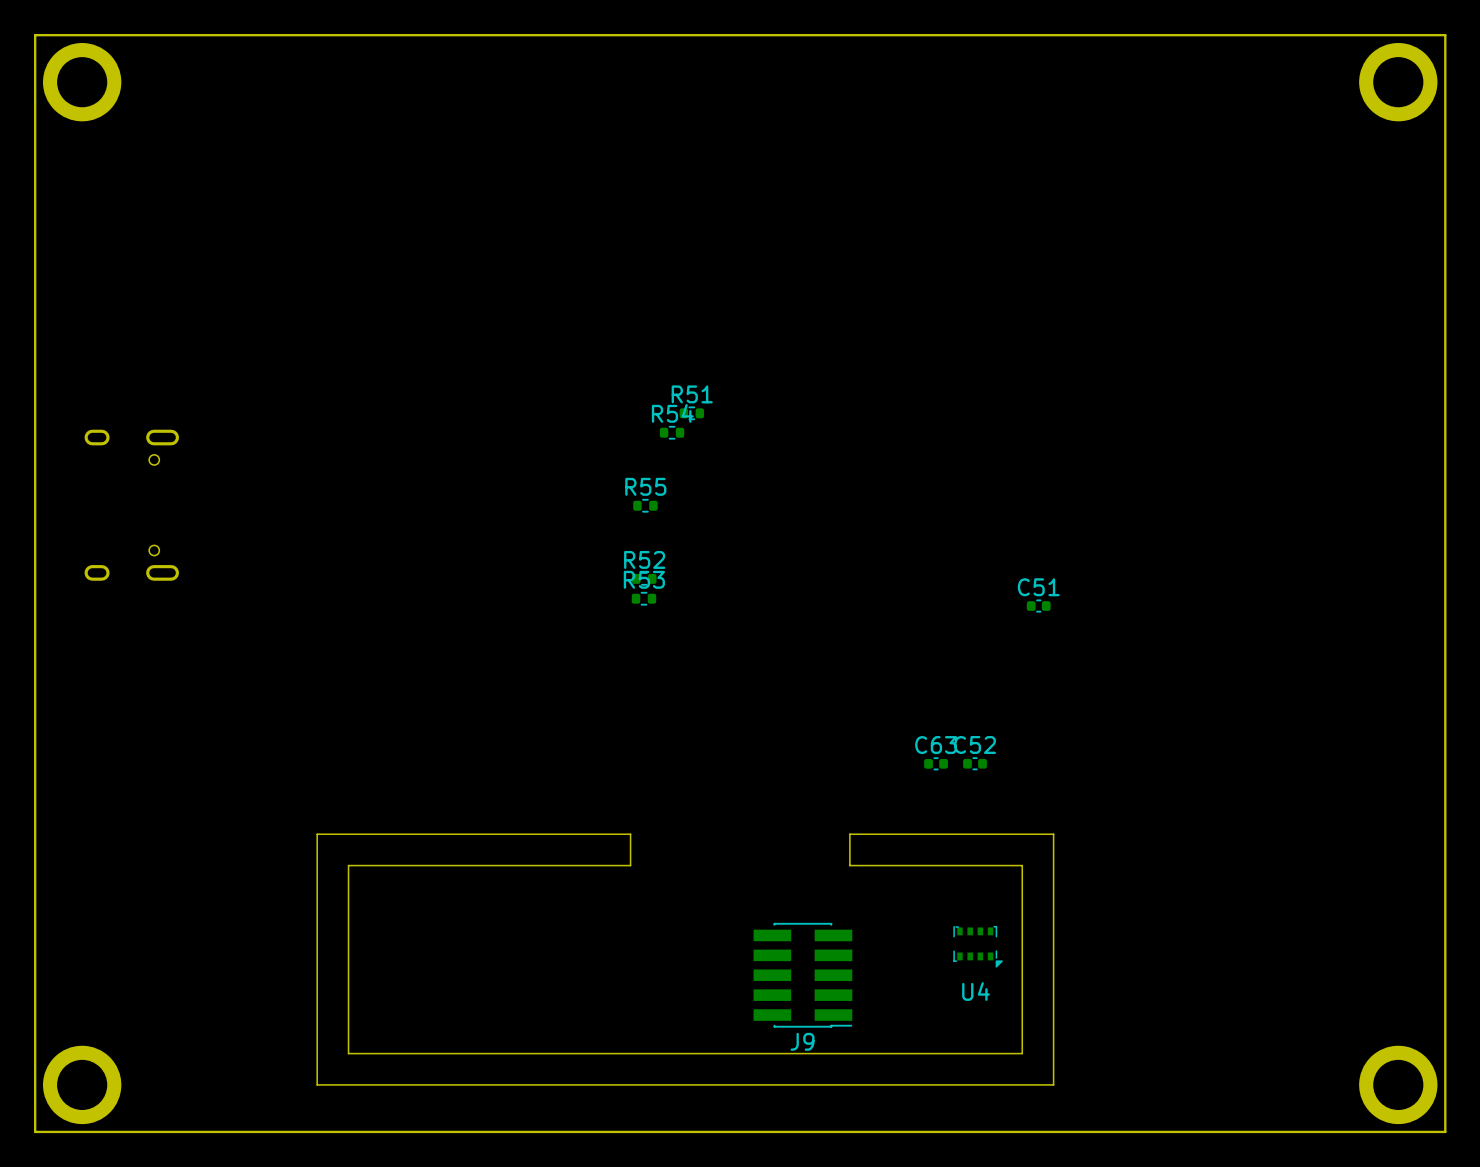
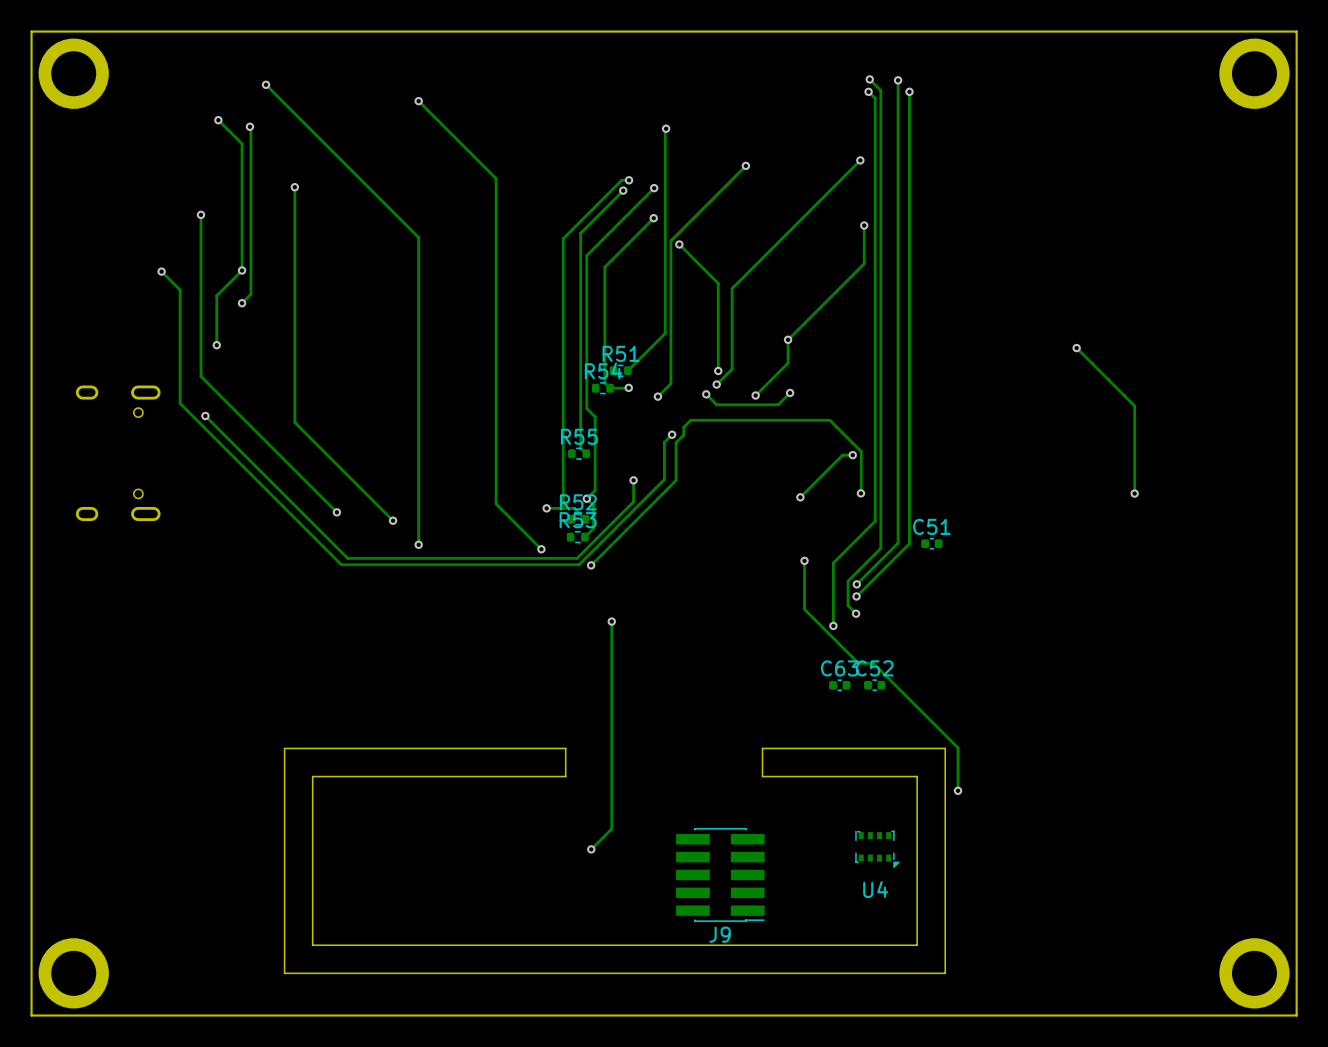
track: none -> (869, 79) (880, 90) (880, 548) (848, 581) (848, 605) (856, 613)
via: none -> (869, 79)
track: none -> (898, 80) (898, 543) (856, 584)
via: none -> (898, 80)
track: none -> (265, 84) (418, 237) (418, 544)
via: none -> (265, 84)
track: none -> (868, 91) (875, 98) (875, 521) (833, 563) (833, 625)
via: none -> (868, 91)
track: none -> (909, 91) (909, 543) (856, 596)
via: none -> (909, 91)
track: none -> (418, 101) (496, 178) (496, 503) (541, 549)
via: none -> (418, 101)
track: none -> (218, 120) (242, 143) (242, 270) (216, 295) (216, 345)
via: none -> (218, 120)
track: none -> (249, 126) (250, 294) (242, 303)
via: none -> (249, 126)
track: none -> (666, 128) (665, 333) (627, 370)
via: none -> (666, 128)
track: none -> (860, 160) (732, 288) (732, 369) (716, 384)
via: none -> (860, 160)
track: none -> (745, 165) (670, 240) (670, 383) (657, 396)
via: none -> (745, 165)
track: none -> (629, 180) (621, 180) (563, 238) (563, 508)
via: none -> (629, 180)
track: none -> (294, 187) (294, 422) (393, 520)
via: none -> (294, 187)
track: none -> (654, 188) (586, 255) (586, 408) (595, 416) (595, 490) (586, 498) (593, 505) (593, 528) (584, 537)
via: none -> (654, 188)
track: none -> (623, 190) (580, 233) (580, 448) (586, 453)
via: none -> (623, 190)
track: none -> (201, 214) (201, 376) (336, 512)
via: none -> (201, 214)
track: none -> (653, 218) (604, 267) (604, 382) (610, 388) (628, 387)
via: none -> (653, 218)
track: none -> (864, 225) (864, 263) (788, 339) (788, 363) (755, 395)
via: none -> (864, 225)
track: none -> (679, 244) (718, 283) (718, 371)
via: none -> (679, 244)
via: none -> (242, 270)
track: none -> (161, 271) (180, 290) (180, 403) (341, 564) (579, 564) (664, 479) (664, 442) (672, 434)
via: none -> (161, 271)
via: none -> (242, 303)
via: none -> (788, 339)
via: none -> (216, 345)
track: none -> (1076, 348) (1134, 406) (1134, 493)
via: none -> (1076, 348)
via: none -> (718, 371)
via: none -> (716, 384)
via: none -> (628, 387)
track: none -> (790, 392) (778, 404) (716, 404) (706, 394)
via: none -> (790, 392)
via: none -> (706, 394)
via: none -> (755, 395)
via: none -> (657, 396)
track: none -> (205, 415) (347, 558) (576, 558) (633, 501) (633, 480)
via: none -> (205, 415)
via: none -> (672, 434)
track: none -> (852, 455) (842, 455) (800, 497)
via: none -> (852, 455)
via: none -> (633, 480)
track: none -> (860, 493) (861, 451) (829, 420) (690, 420) (683, 427) (683, 434) (676, 442) (676, 480) (591, 565)
via: none -> (860, 493)
via: none -> (1134, 493)
via: none -> (800, 497)
via: none -> (586, 498)
track: none -> (546, 508) (574, 508) (585, 519)
via: none -> (546, 508)
via: none -> (336, 512)
via: none -> (393, 520)
via: none -> (418, 544)
via: none -> (541, 549)
track: none -> (804, 560) (804, 609) (858, 663) (873, 663) (958, 747) (958, 790)
via: none -> (804, 560)
via: none -> (591, 565)
via: none -> (856, 584)
via: none -> (856, 596)
via: none -> (856, 613)
track: none -> (611, 621) (611, 828) (591, 849)
via: none -> (611, 621)
via: none -> (833, 625)
via: none -> (958, 790)
via: none -> (591, 849)

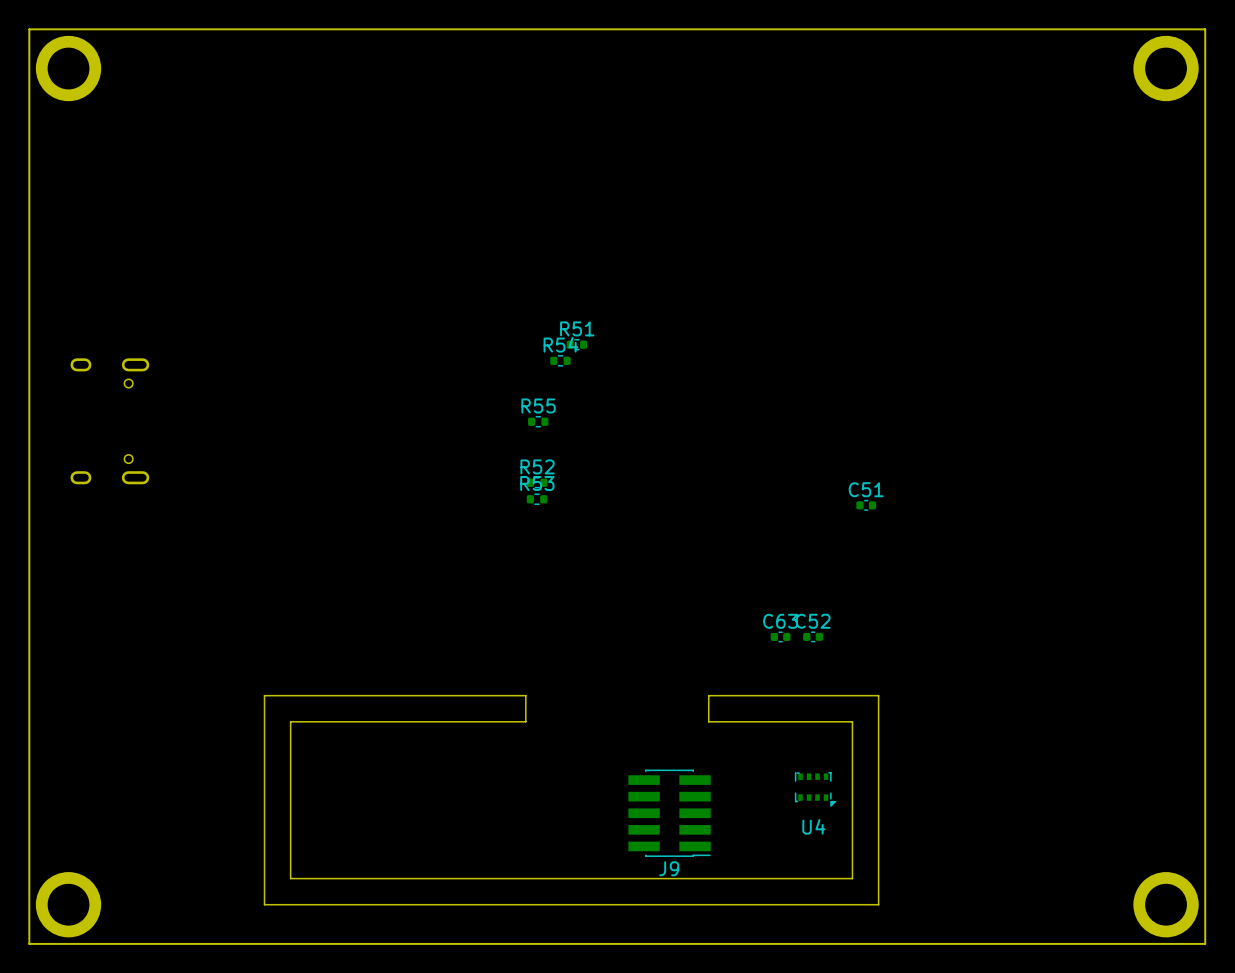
track: (869, 79) (880, 90) (880, 548) (848, 581) (848, 605) (856, 613) -> none
via: (869, 79) -> none
track: (898, 80) (898, 543) (856, 584) -> none
via: (898, 80) -> none
track: (265, 84) (418, 237) (418, 544) -> none
via: (265, 84) -> none
track: (868, 91) (875, 98) (875, 521) (833, 563) (833, 625) -> none
via: (868, 91) -> none
track: (909, 91) (909, 543) (856, 596) -> none
via: (909, 91) -> none
track: (418, 101) (496, 178) (496, 503) (541, 549) -> none
via: (418, 101) -> none
track: (218, 120) (242, 143) (242, 270) (216, 295) (216, 345) -> none
via: (218, 120) -> none
track: (249, 126) (250, 294) (242, 303) -> none
via: (249, 126) -> none
track: (666, 128) (665, 333) (627, 370) -> none
via: (666, 128) -> none
track: (860, 160) (732, 288) (732, 369) (716, 384) -> none
via: (860, 160) -> none
track: (745, 165) (670, 240) (670, 383) (657, 396) -> none
via: (745, 165) -> none
track: (629, 180) (621, 180) (563, 238) (563, 508) -> none
via: (629, 180) -> none
track: (294, 187) (294, 422) (393, 520) -> none
via: (294, 187) -> none
track: (654, 188) (586, 255) (586, 408) (595, 416) (595, 490) (586, 498) (593, 505) (593, 528) (584, 537) -> none
via: (654, 188) -> none
track: (623, 190) (580, 233) (580, 448) (586, 453) -> none
via: (623, 190) -> none
track: (201, 214) (201, 376) (336, 512) -> none
via: (201, 214) -> none
track: (653, 218) (604, 267) (604, 382) (610, 388) (628, 387) -> none
via: (653, 218) -> none
track: (864, 225) (864, 263) (788, 339) (788, 363) (755, 395) -> none
via: (864, 225) -> none
track: (679, 244) (718, 283) (718, 371) -> none
via: (679, 244) -> none
via: (242, 270) -> none
track: (161, 271) (180, 290) (180, 403) (341, 564) (579, 564) (664, 479) (664, 442) (672, 434) -> none
via: (161, 271) -> none
via: (242, 303) -> none
via: (788, 339) -> none
via: (216, 345) -> none
track: (1076, 348) (1134, 406) (1134, 493) -> none
via: (1076, 348) -> none
via: (718, 371) -> none
via: (716, 384) -> none
via: (628, 387) -> none
track: (790, 392) (778, 404) (716, 404) (706, 394) -> none
via: (790, 392) -> none
via: (706, 394) -> none
via: (755, 395) -> none
via: (657, 396) -> none
track: (205, 415) (347, 558) (576, 558) (633, 501) (633, 480) -> none
via: (205, 415) -> none
via: (672, 434) -> none
track: (852, 455) (842, 455) (800, 497) -> none
via: (852, 455) -> none
via: (633, 480) -> none
track: (860, 493) (861, 451) (829, 420) (690, 420) (683, 427) (683, 434) (676, 442) (676, 480) (591, 565) -> none
via: (860, 493) -> none
via: (1134, 493) -> none
via: (800, 497) -> none
via: (586, 498) -> none
track: (546, 508) (574, 508) (585, 519) -> none
via: (546, 508) -> none
via: (336, 512) -> none
via: (393, 520) -> none
via: (418, 544) -> none
via: (541, 549) -> none
track: (804, 560) (804, 609) (858, 663) (873, 663) (958, 747) (958, 790) -> none
via: (804, 560) -> none
via: (591, 565) -> none
via: (856, 584) -> none
via: (856, 596) -> none
via: (856, 613) -> none
track: (611, 621) (611, 828) (591, 849) -> none
via: (611, 621) -> none
via: (833, 625) -> none
via: (958, 790) -> none
via: (591, 849) -> none

